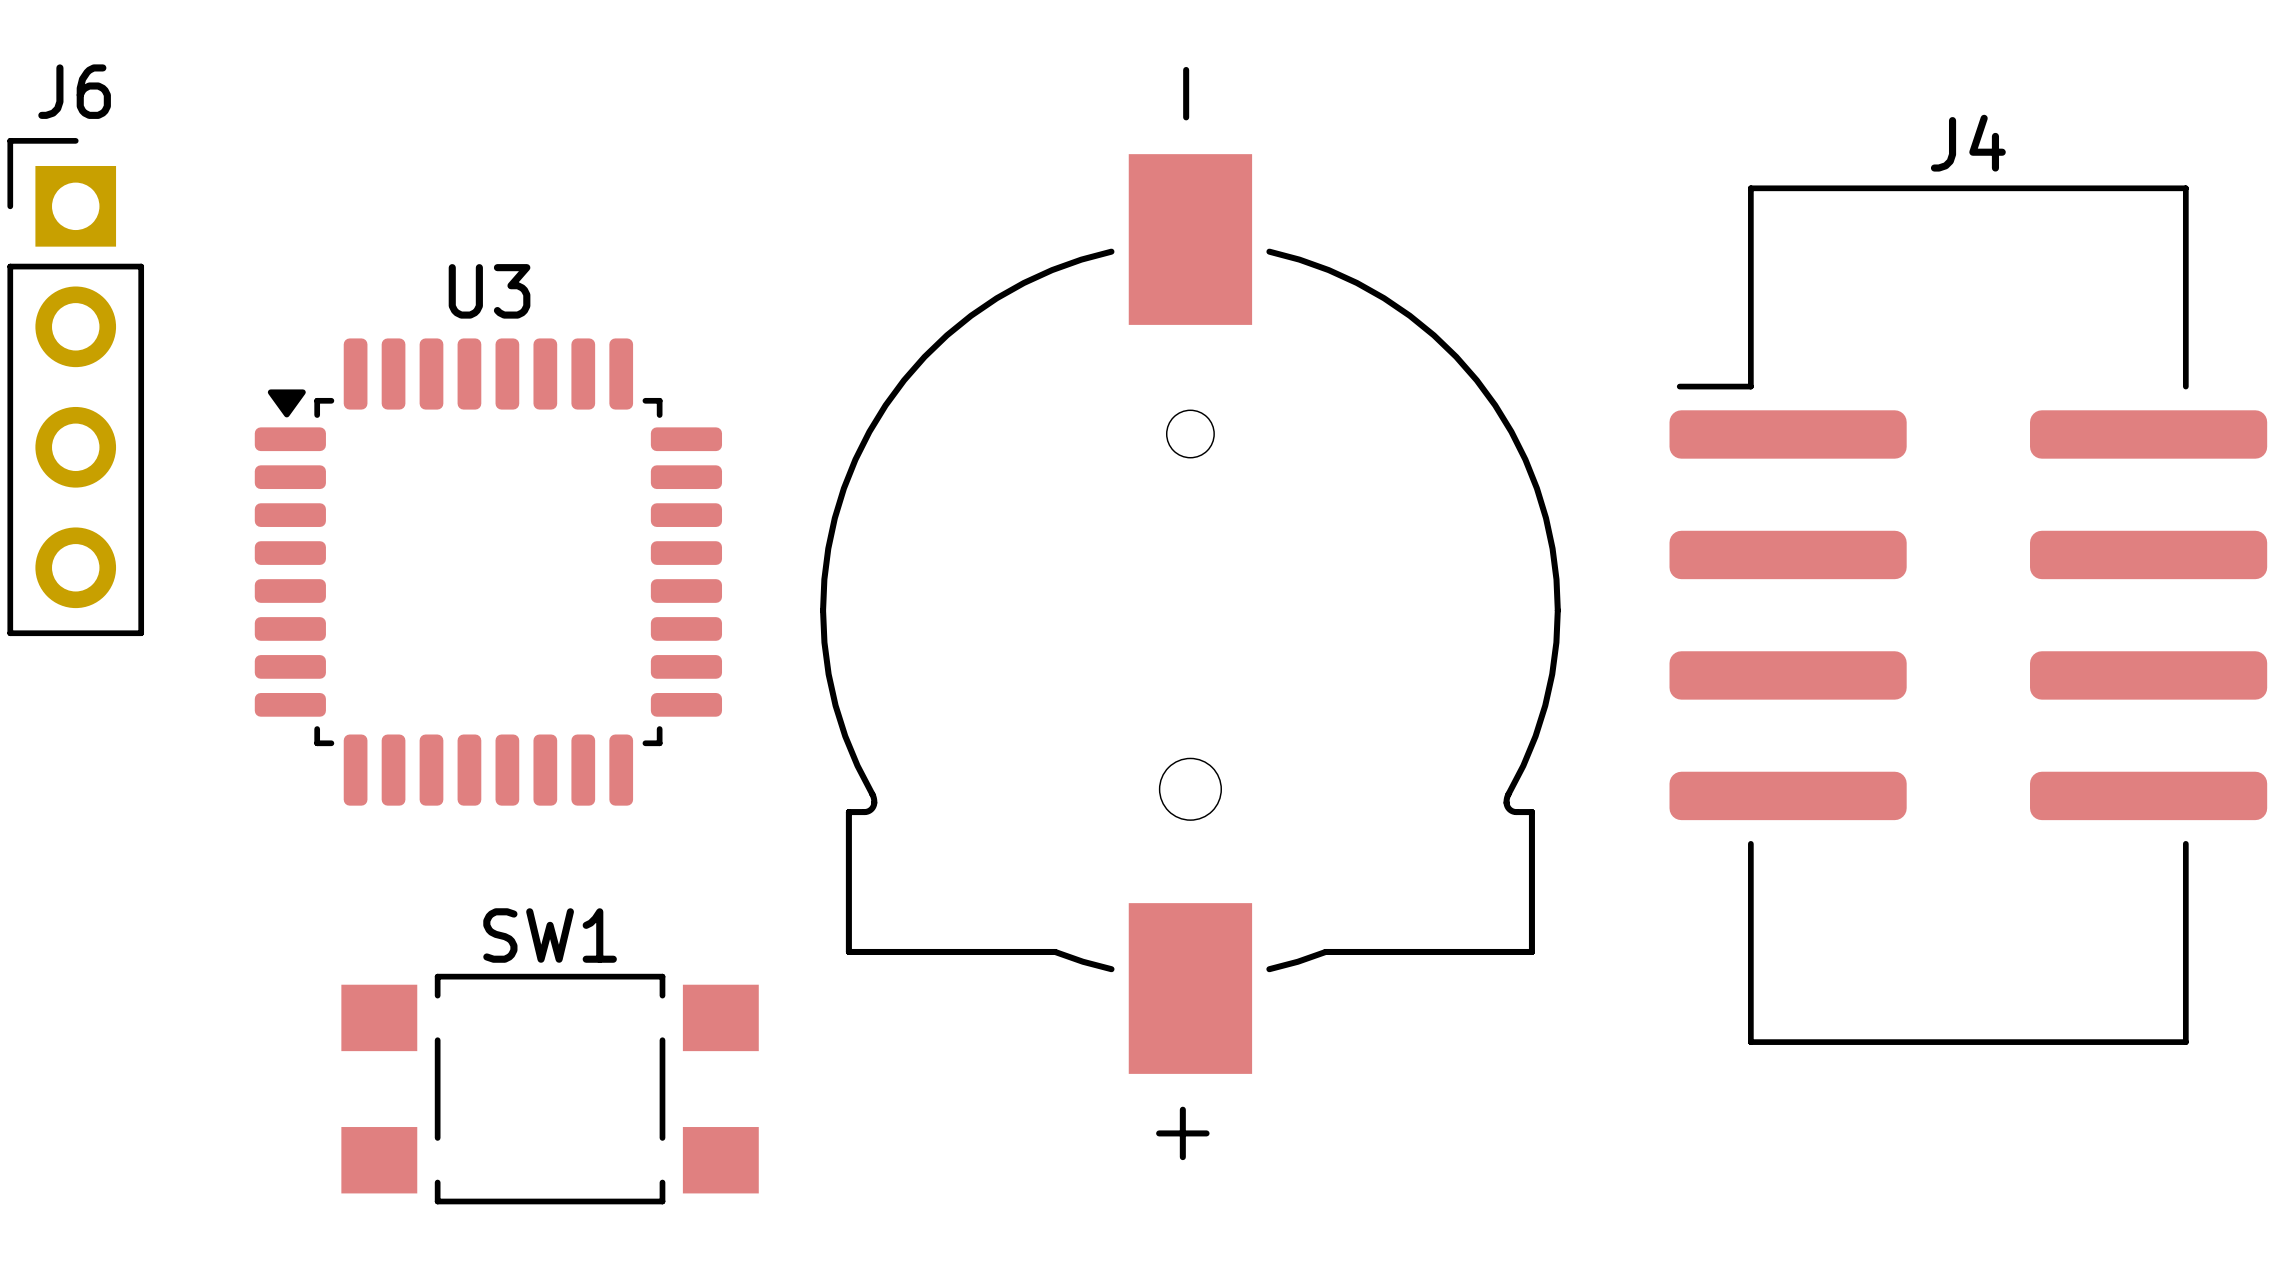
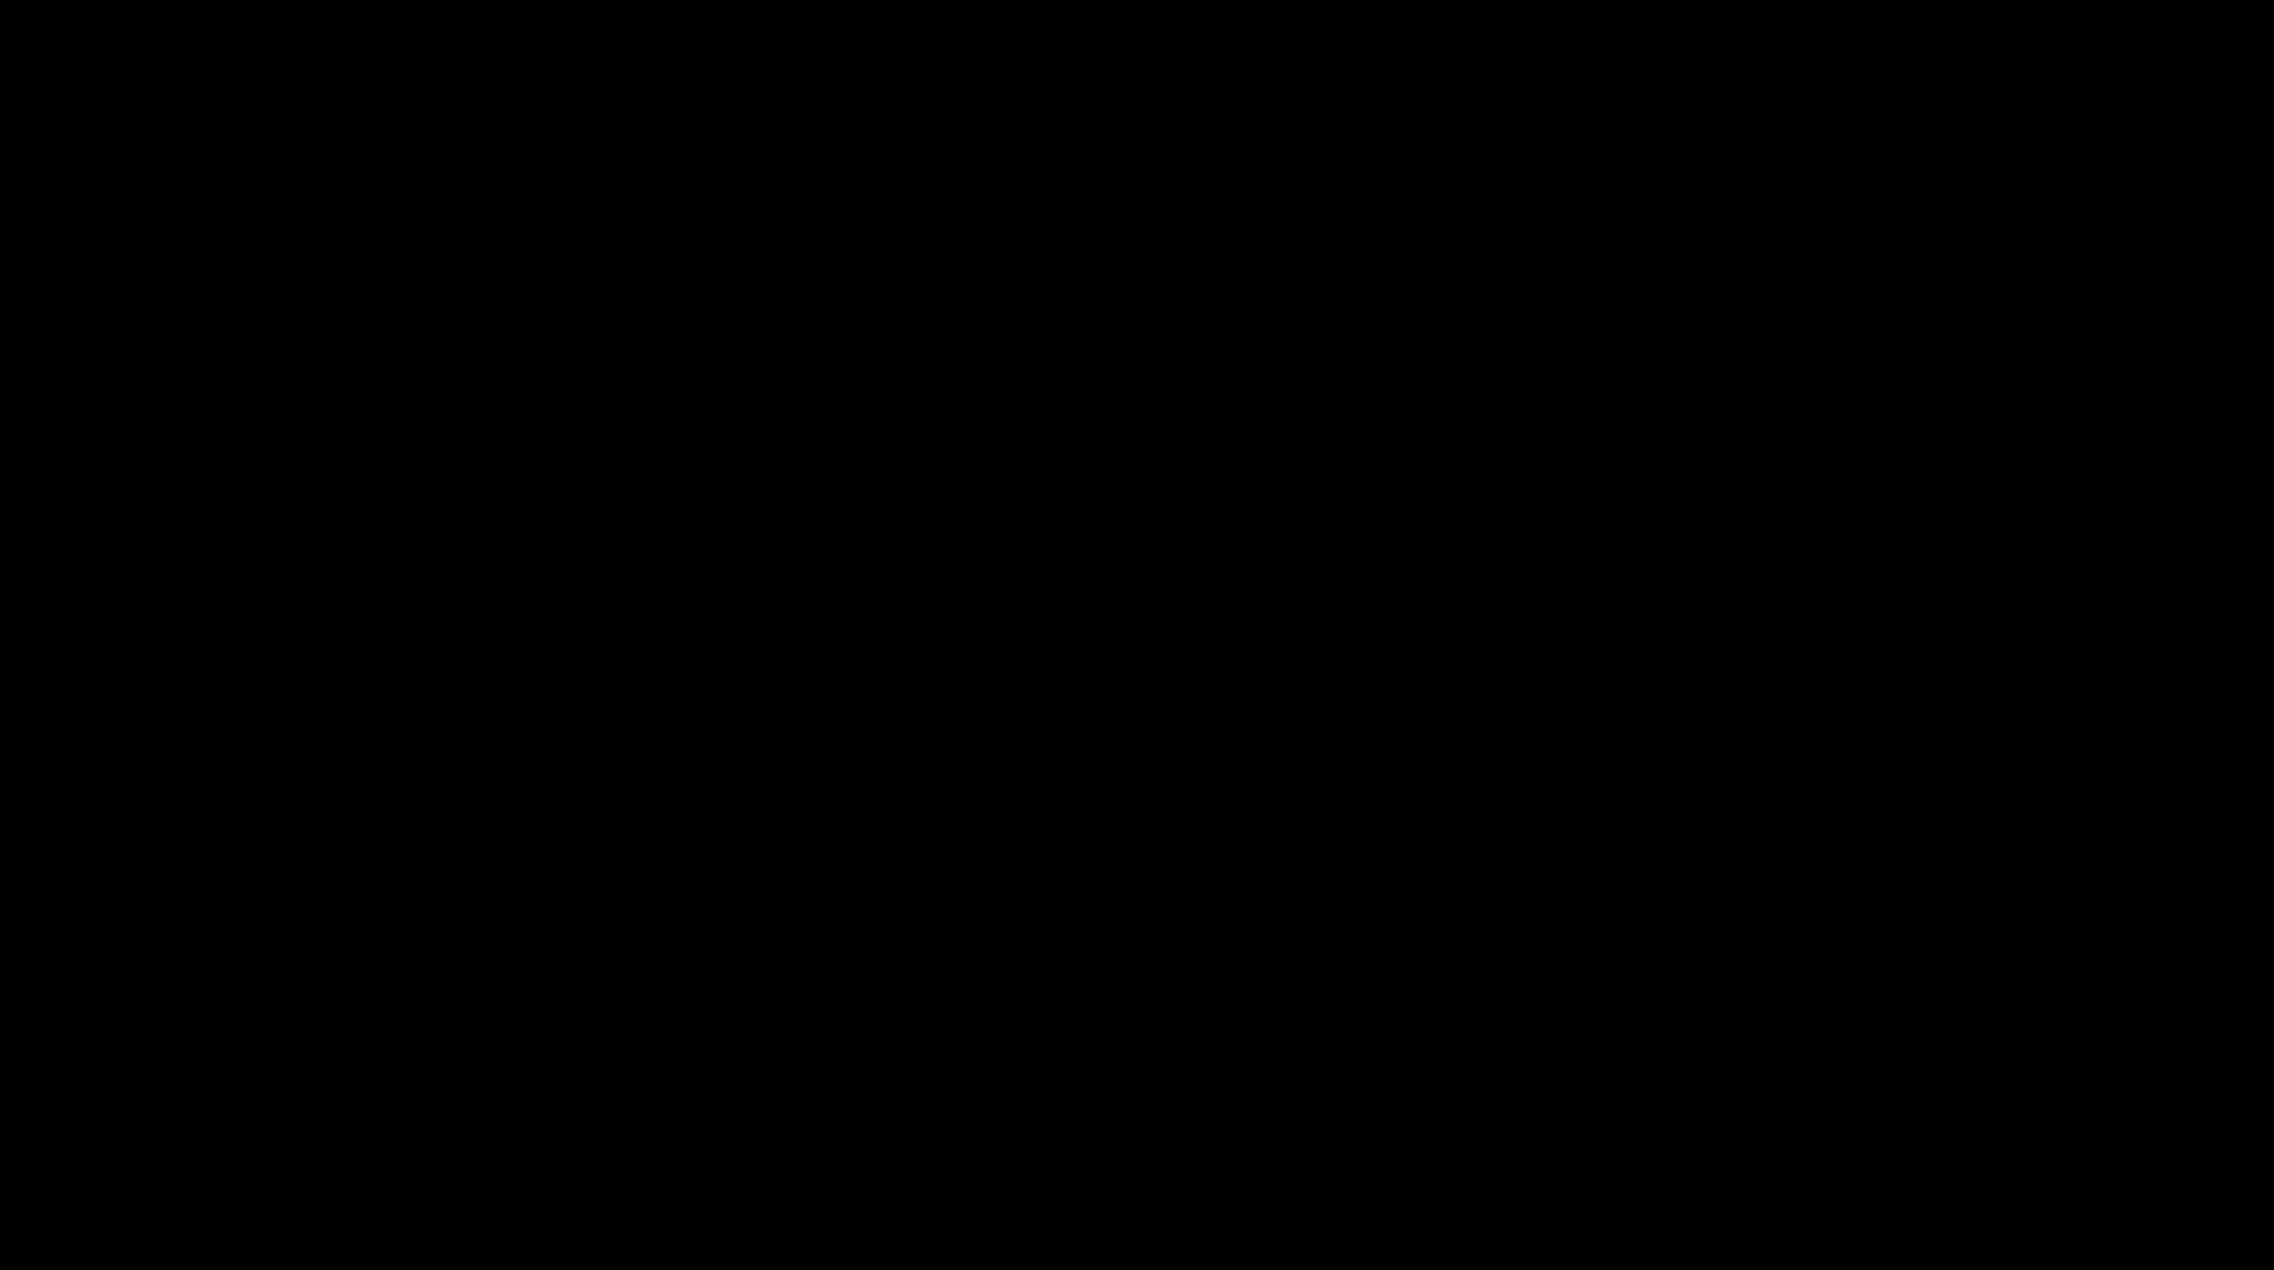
J6: (75, 387) -> none
U3: (488, 572) -> none
part: (1190, 613) -> none
J4: (1968, 615) -> none
SW1: (550, 1089) -> none

